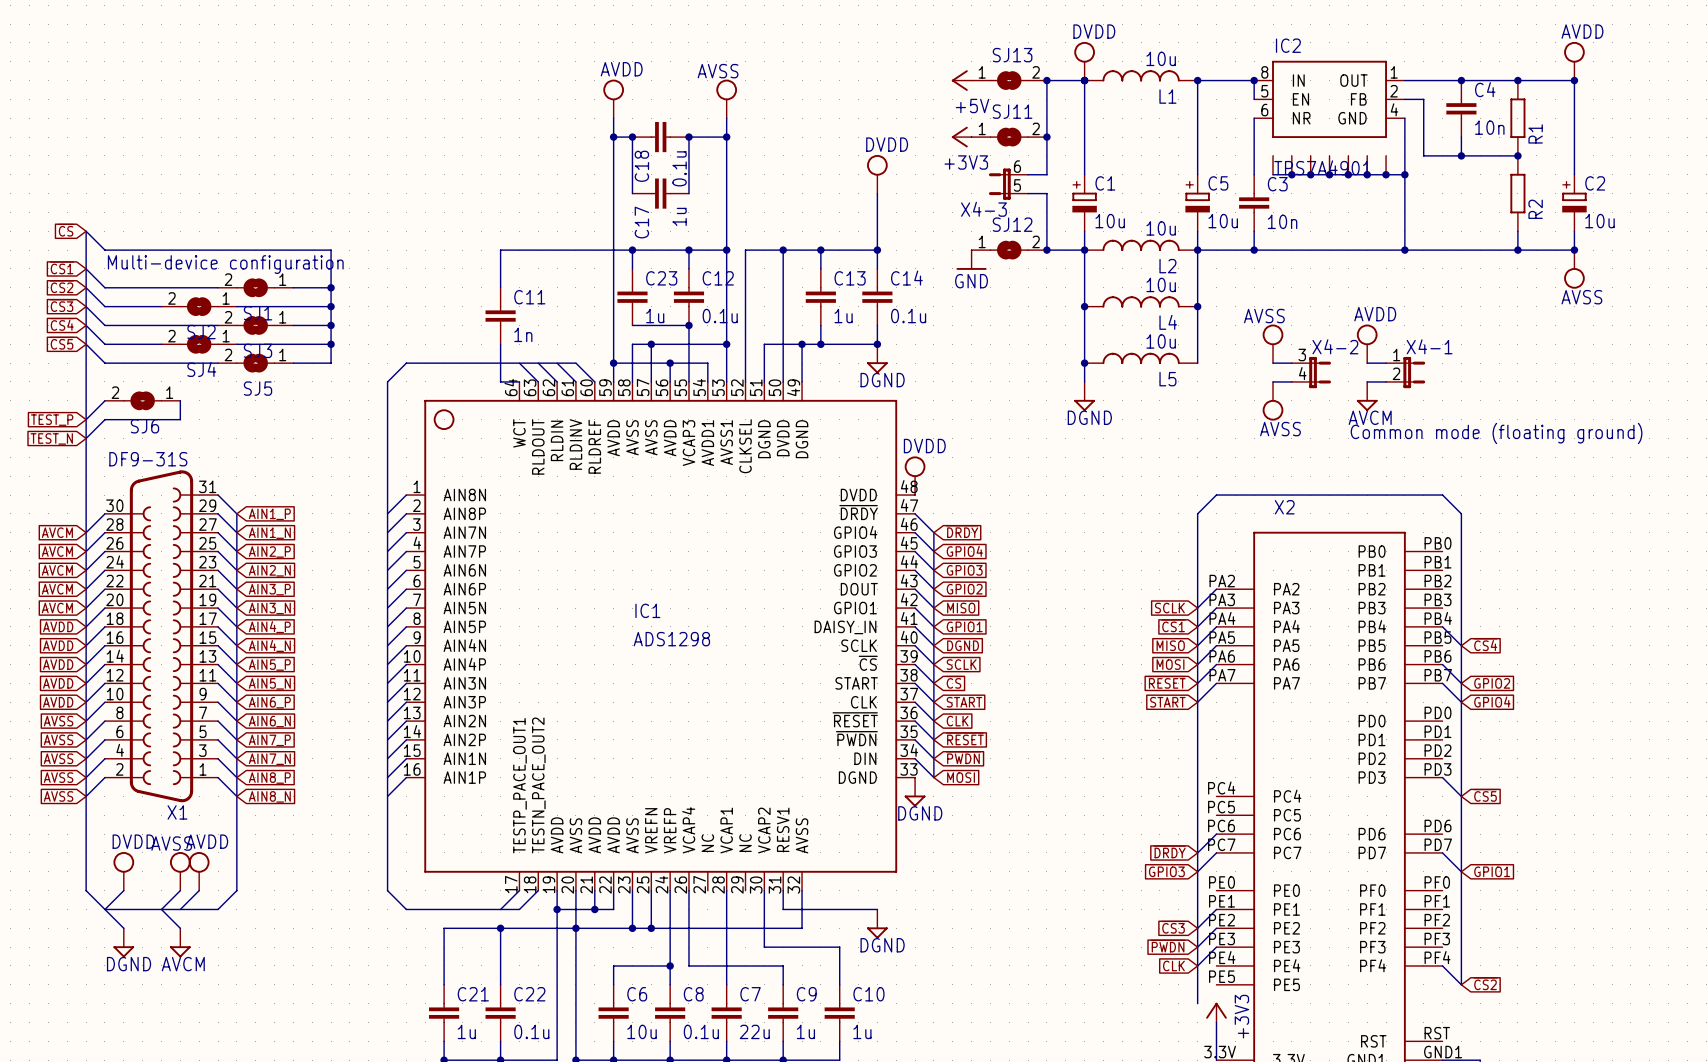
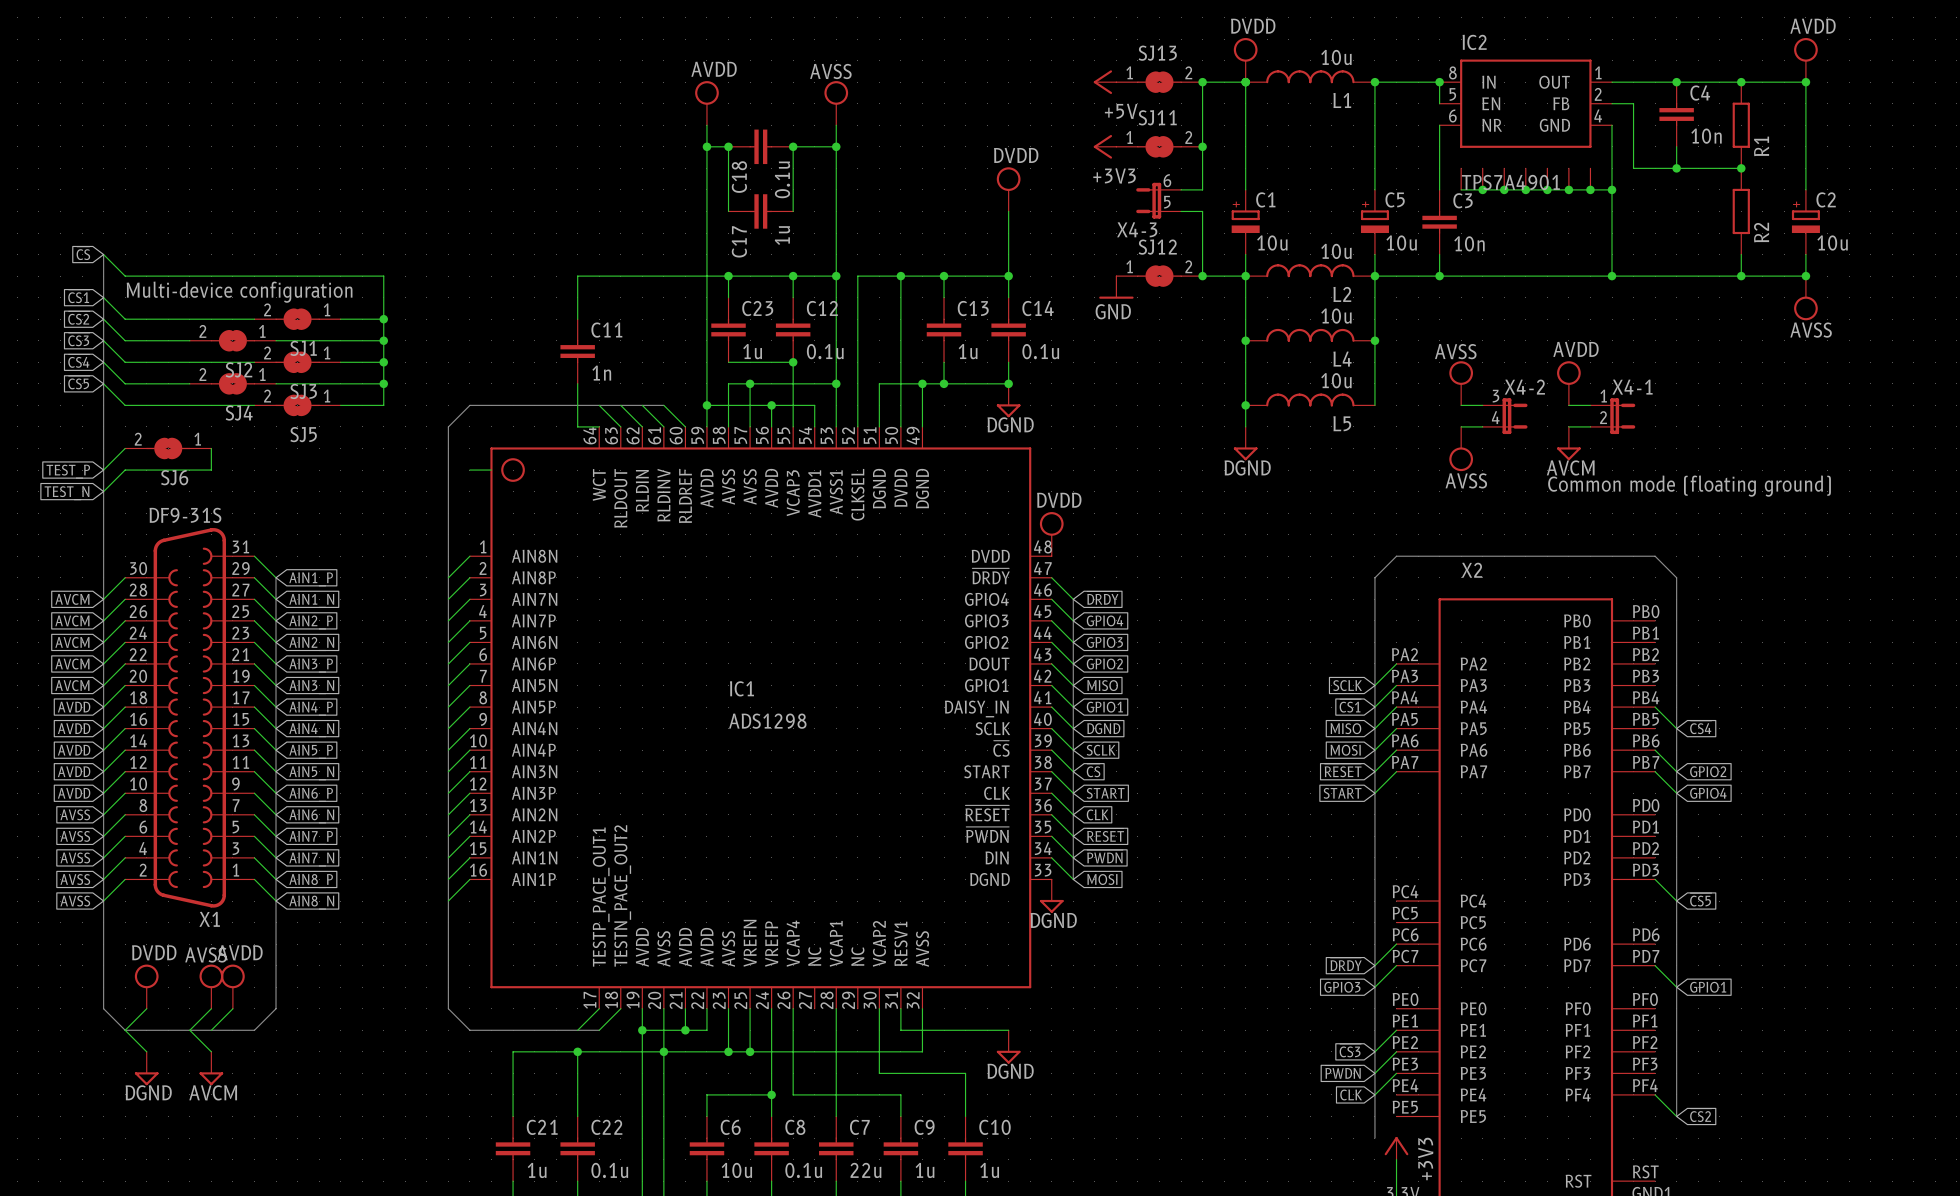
wire: none -> (469, 470) (491, 470)

